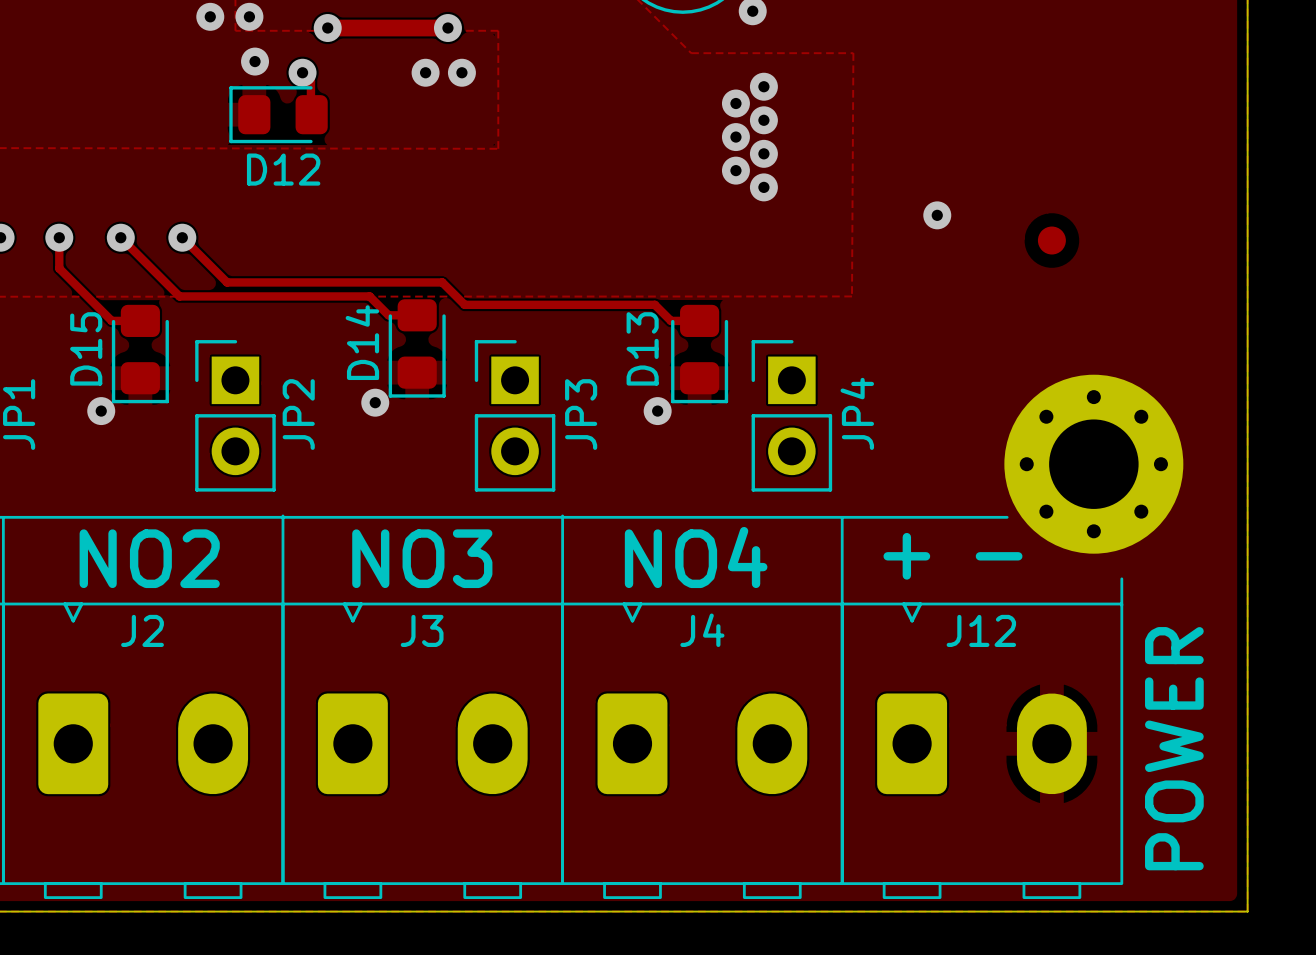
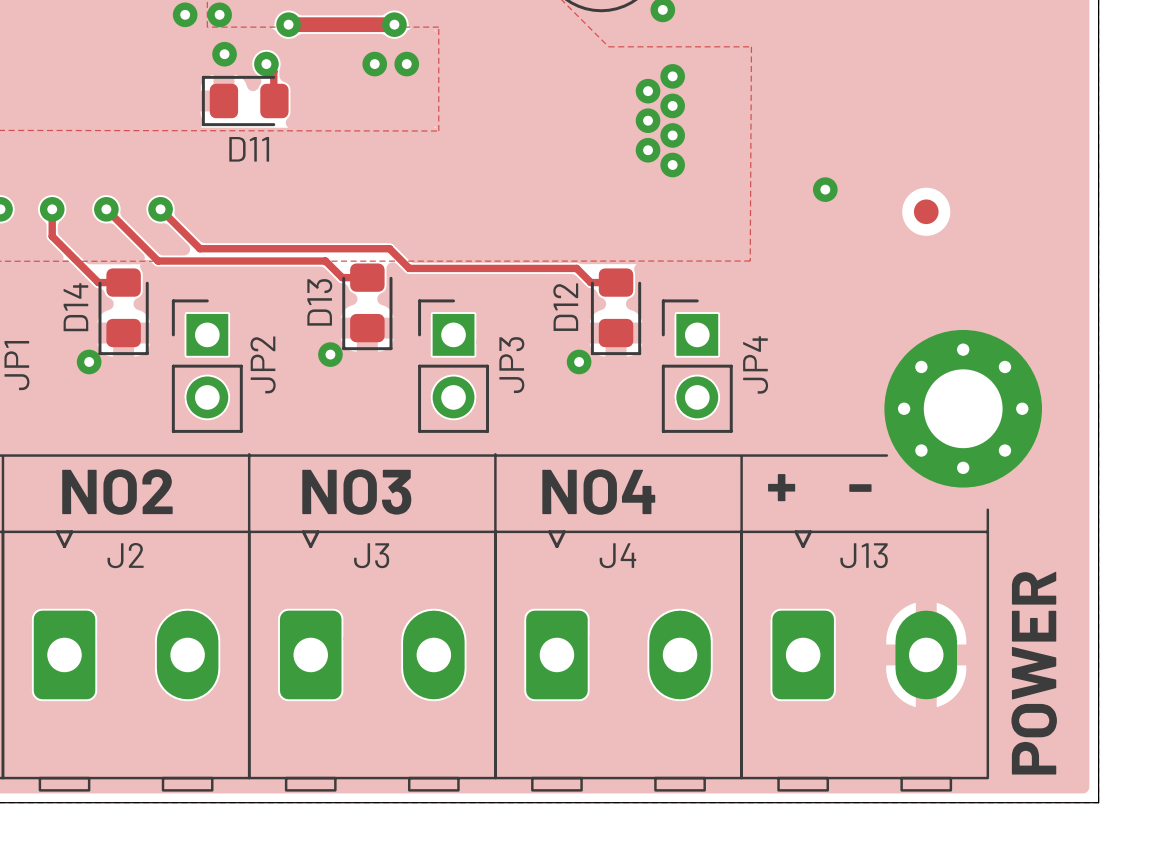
D12 name: D12 (283, 169) -> D11 (249, 149)
D14 name: D14 (362, 342) -> D13 (319, 302)
D15 name: D15 (86, 348) -> D14 (75, 307)
D13 name: D13 (642, 348) -> D12 (565, 307)
J12 name: J12 (981, 630) -> J13 (864, 555)

